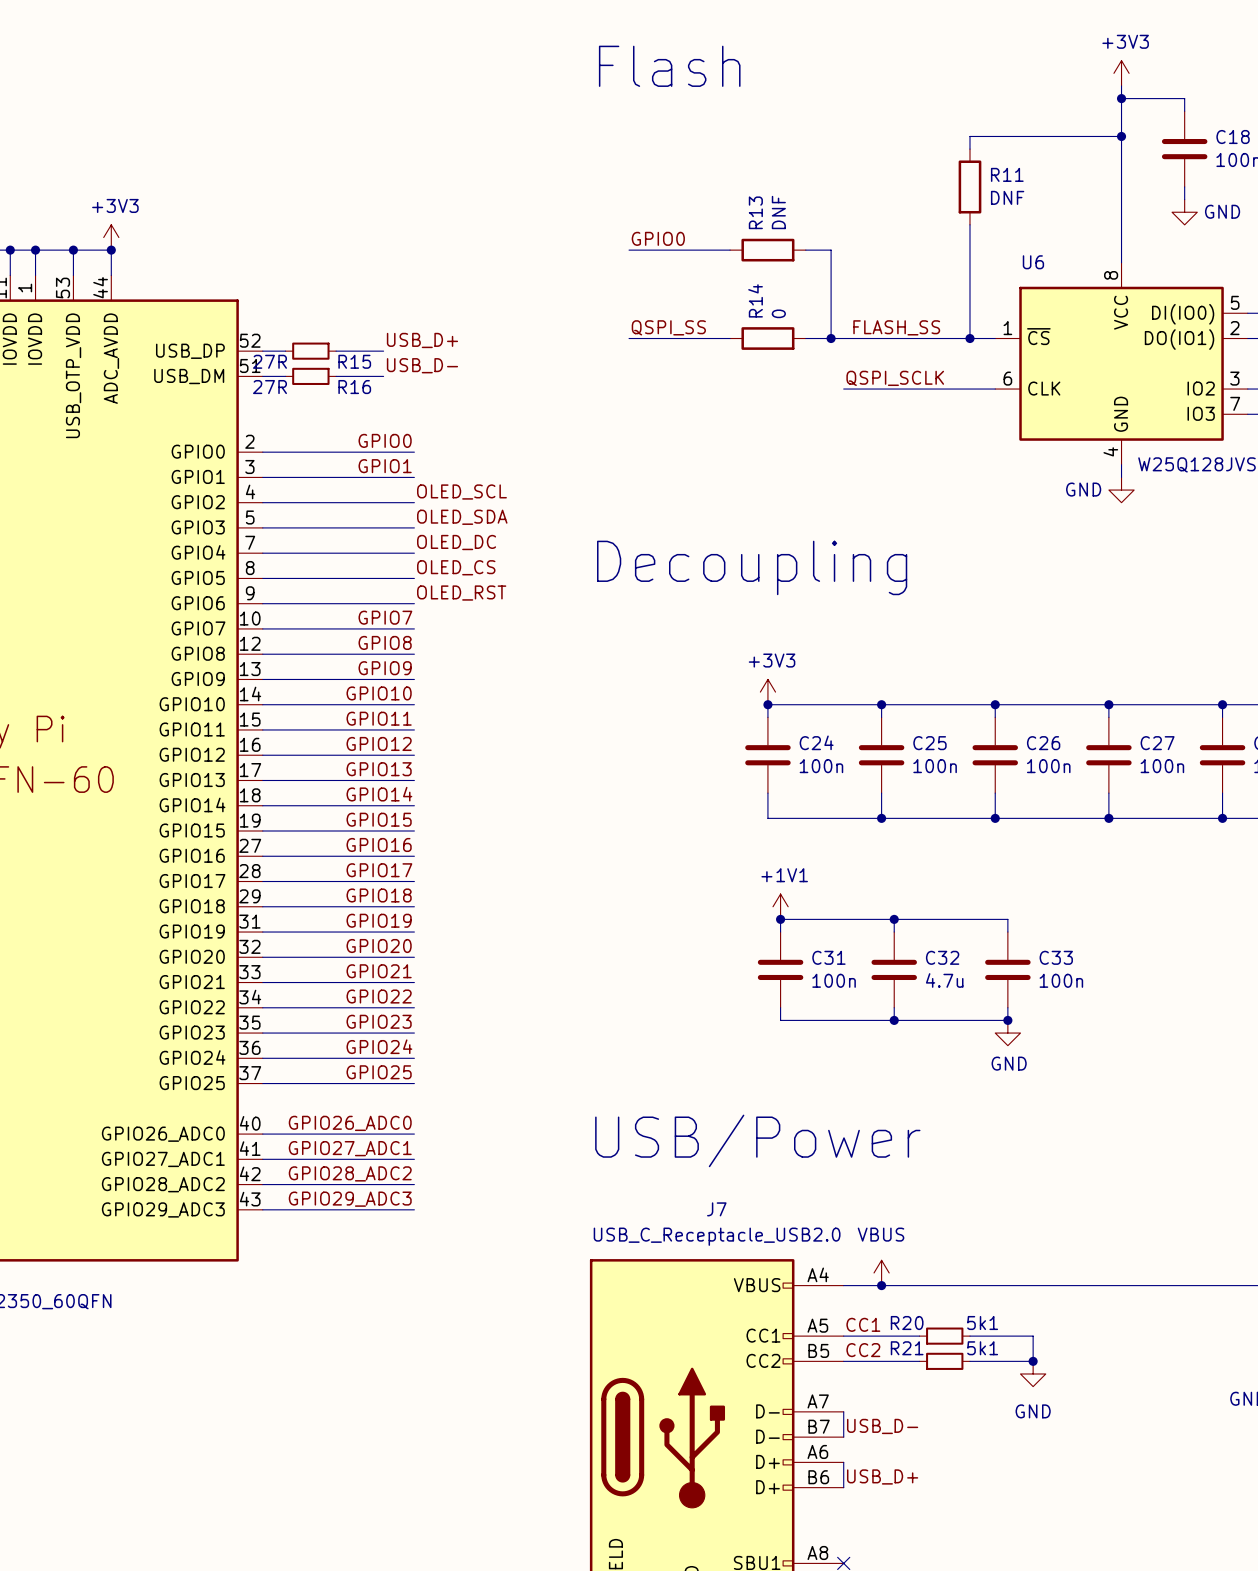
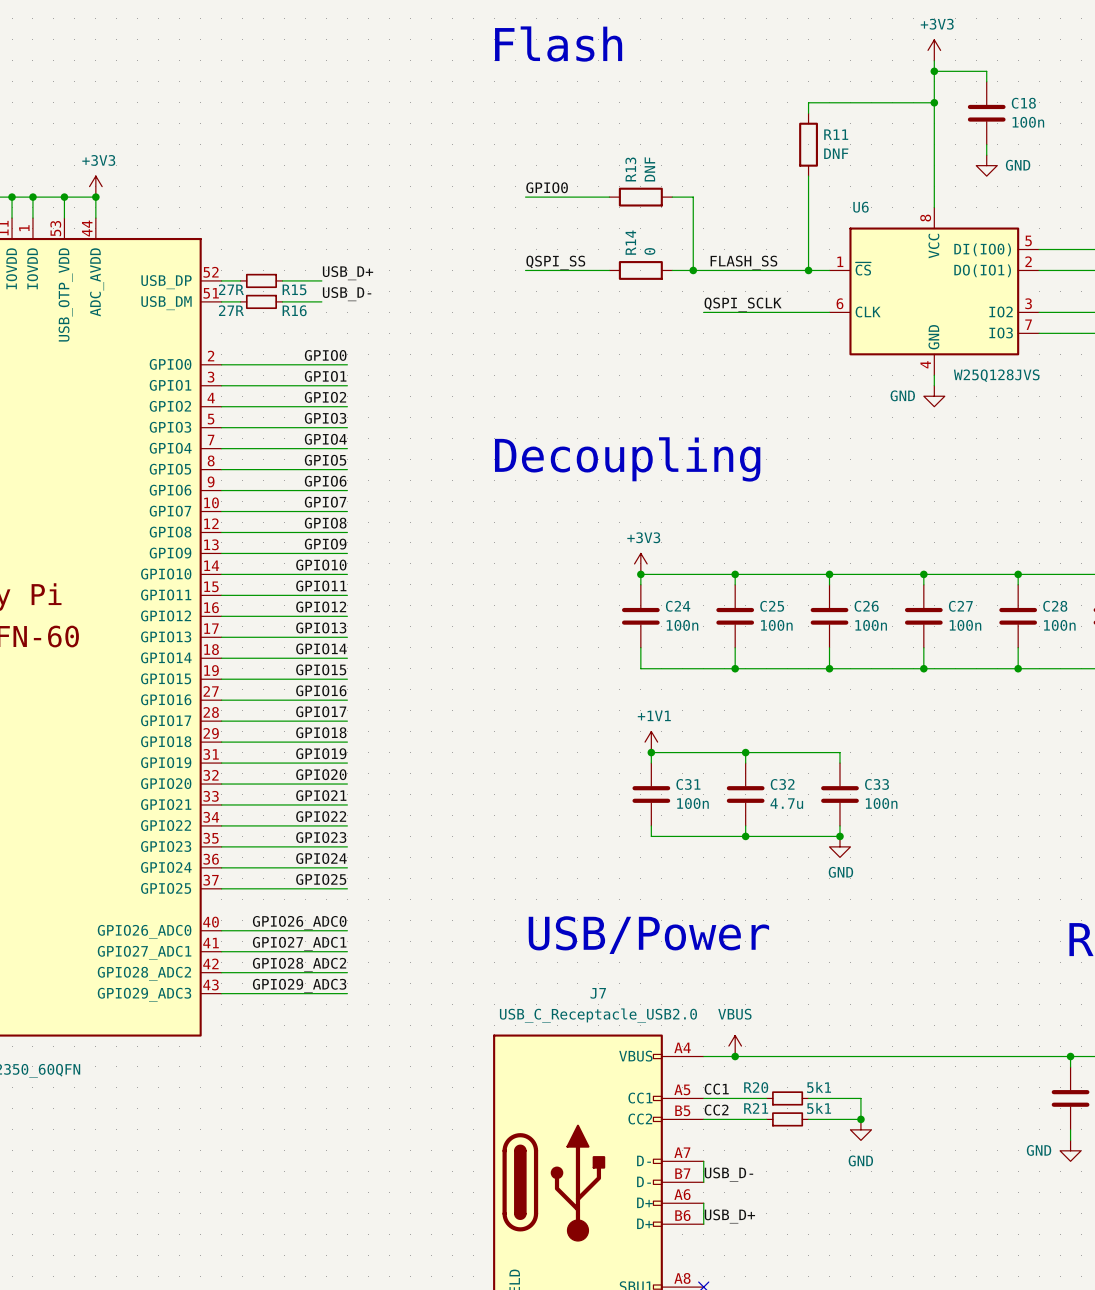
label: OLED_SCL (461, 492) -> GPIO2 (325, 397)
label: OLED_SDA (462, 517) -> GPIO3 (325, 418)
label: OLED_DC (456, 542) -> GPIO4 (325, 439)
label: OLED_CS (456, 567) -> GPIO5 (325, 460)
label: OLED_RST (461, 593) -> GPIO6 (325, 481)

